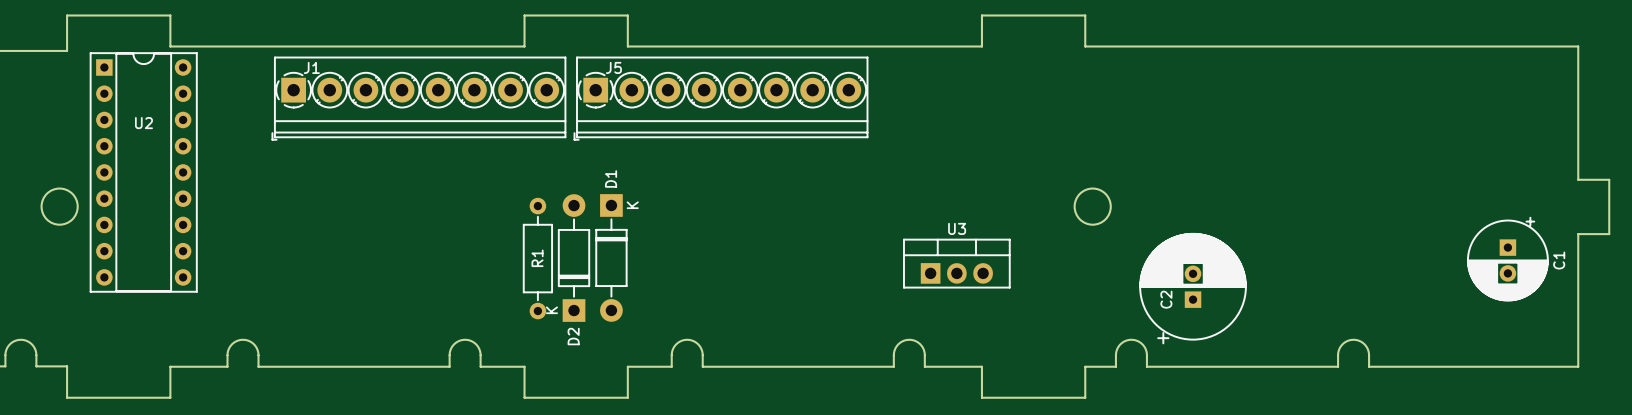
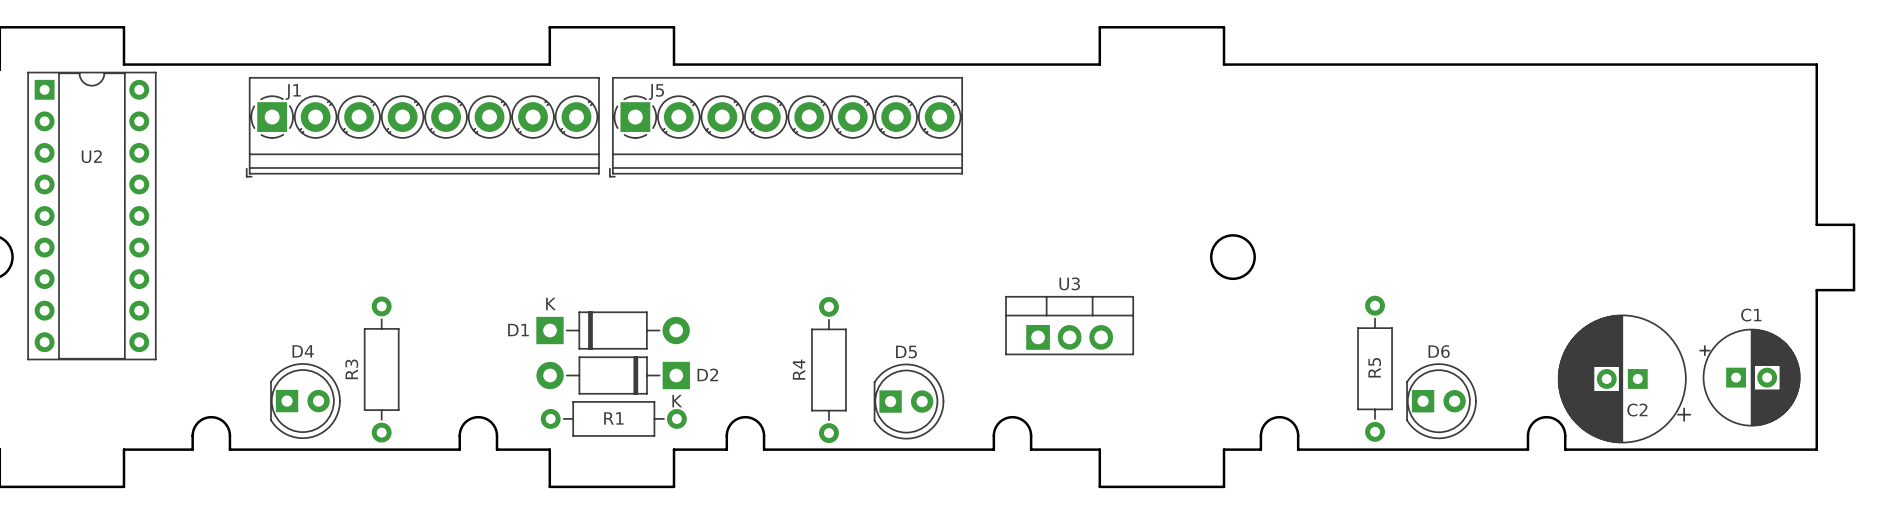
D1 rotation: 0° (611, 257) -> 90° counterclockwise (613, 330)
R1 rotation: 0° (537, 258) -> 90° clockwise (613, 418)
R1 position: (537, 258) -> (613, 418)
D2 rotation: 0° (574, 258) -> 90° counterclockwise (613, 375)
C1 rotation: 0° (1507, 259) -> 90° counterclockwise (1749, 377)
C2 rotation: 0° (1193, 288) -> 90° counterclockwise (1624, 378)
C2 position: (1193, 288) -> (1624, 378)
R5: none -> (1375, 368)
R3: none -> (381, 369)
R4: none -> (828, 370)
D4: none -> (305, 401)
D5: none -> (909, 401)
D6: none -> (1441, 401)

